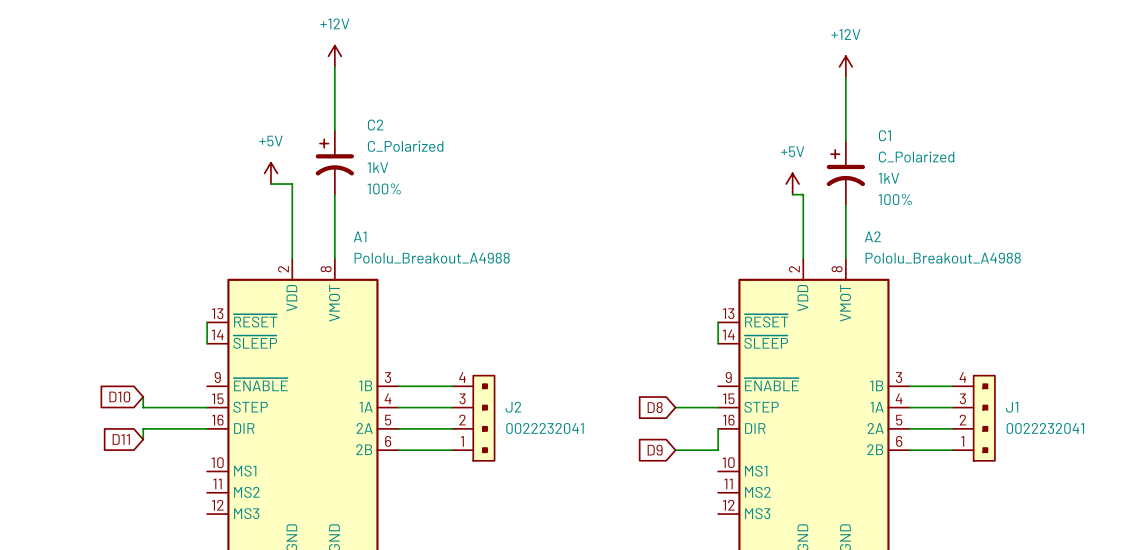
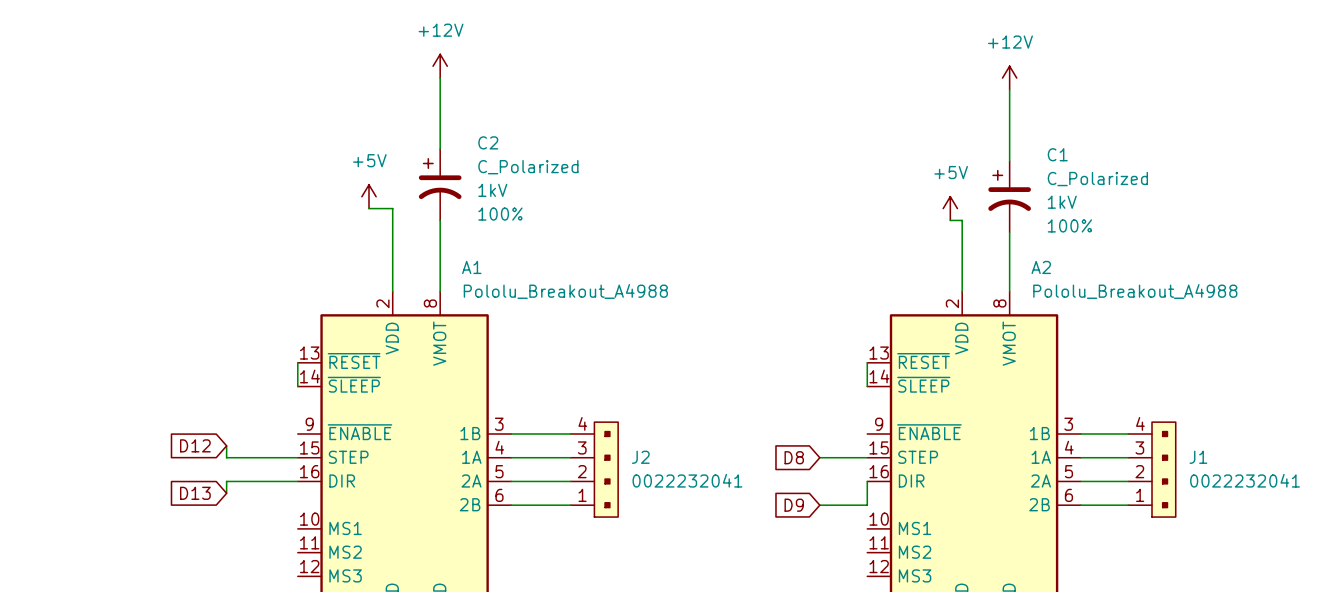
global label: D10 (119, 396) -> D12 (195, 445)
global label: D11 (121, 439) -> D13 (195, 493)

